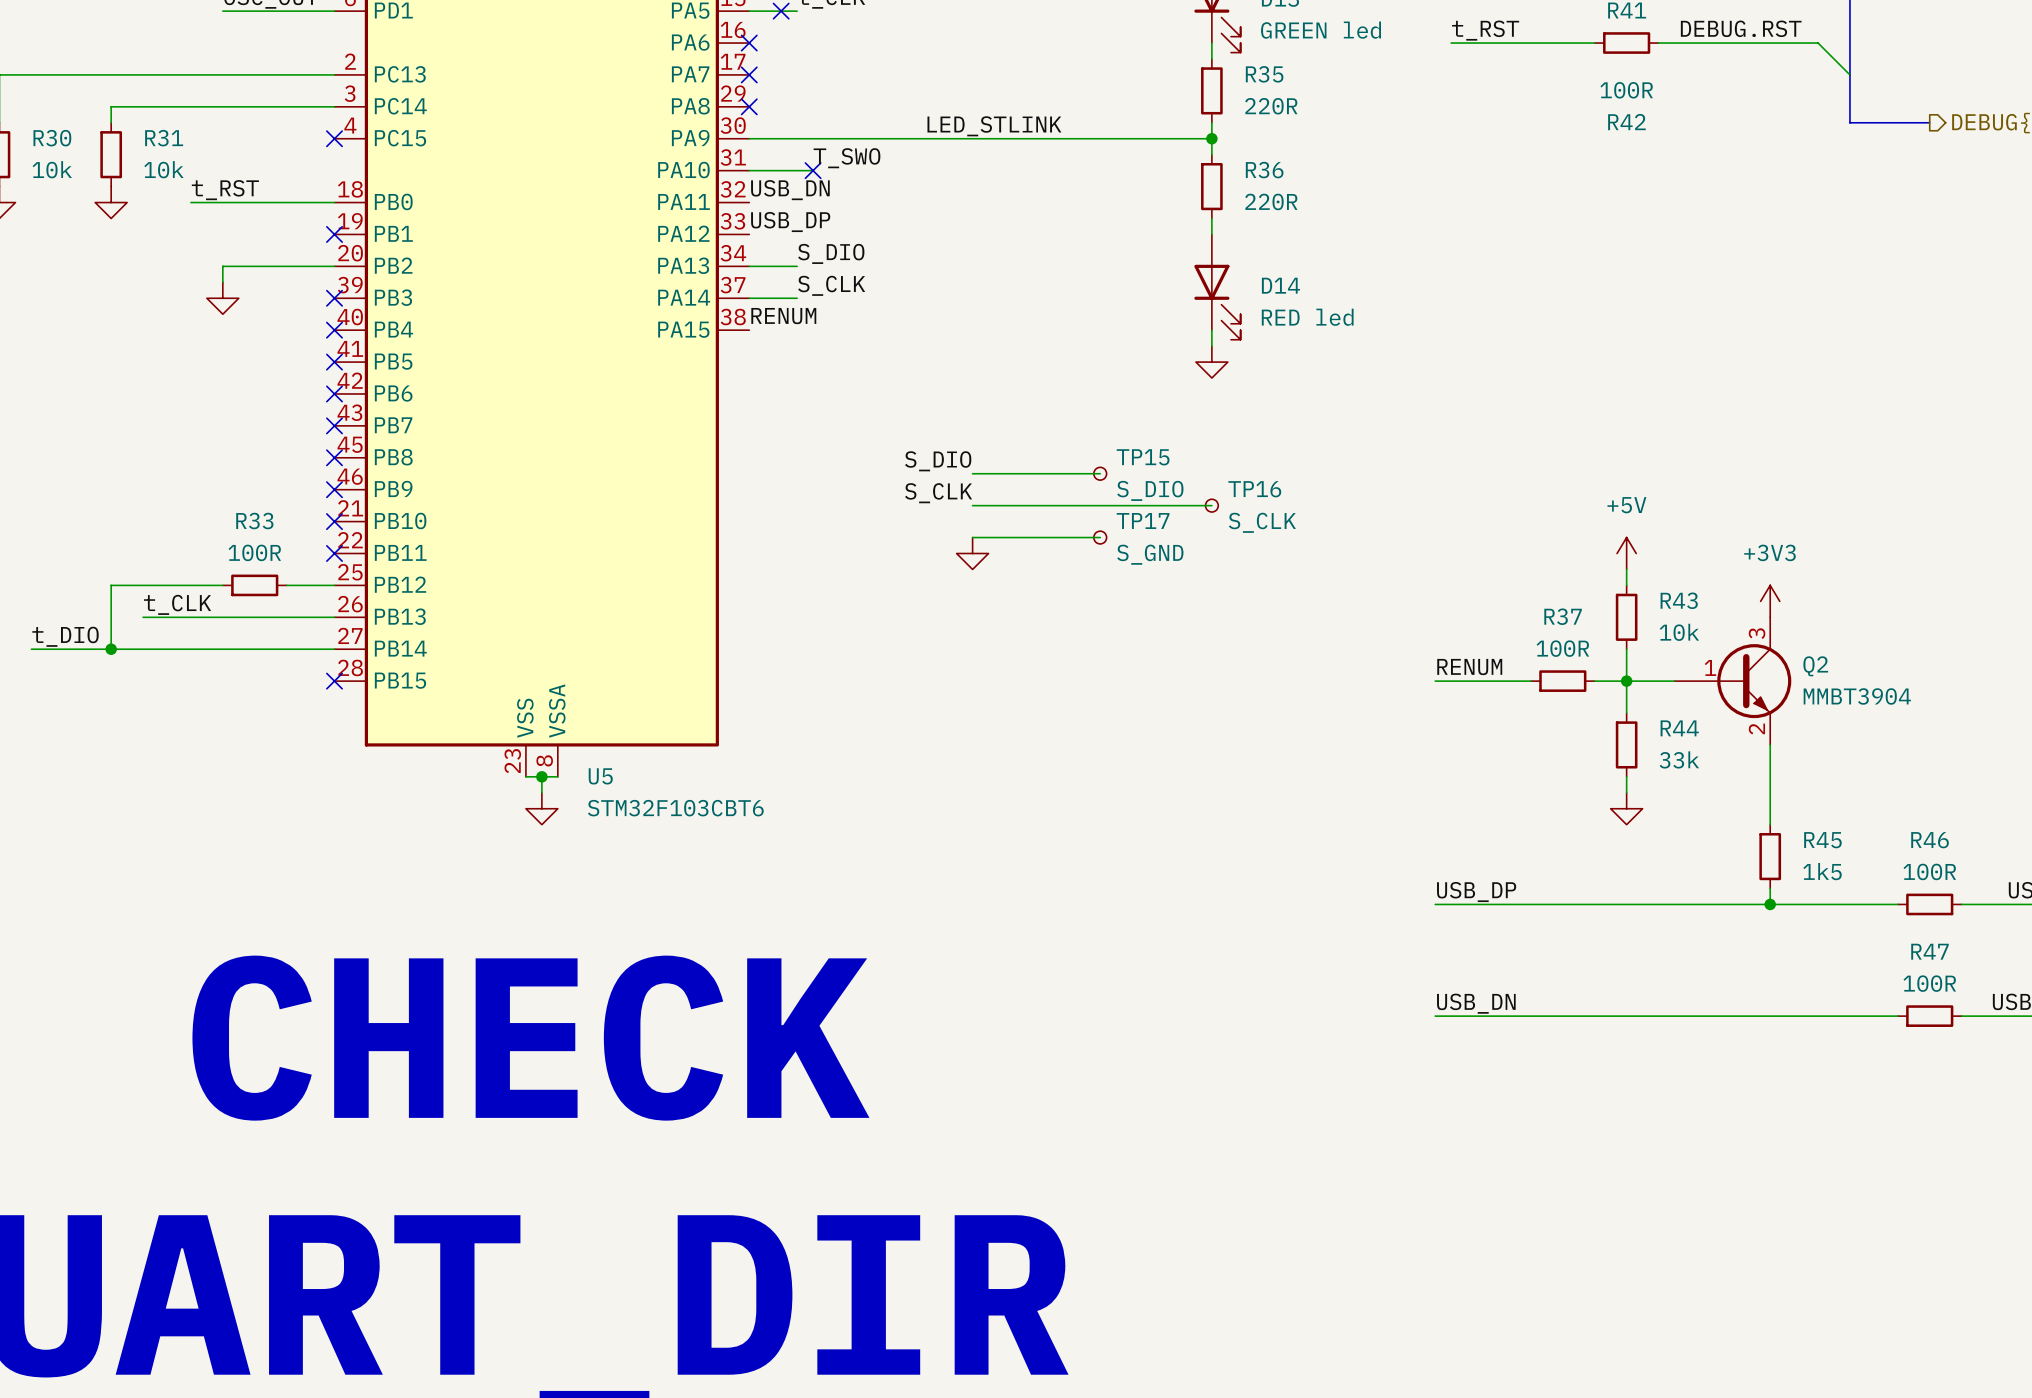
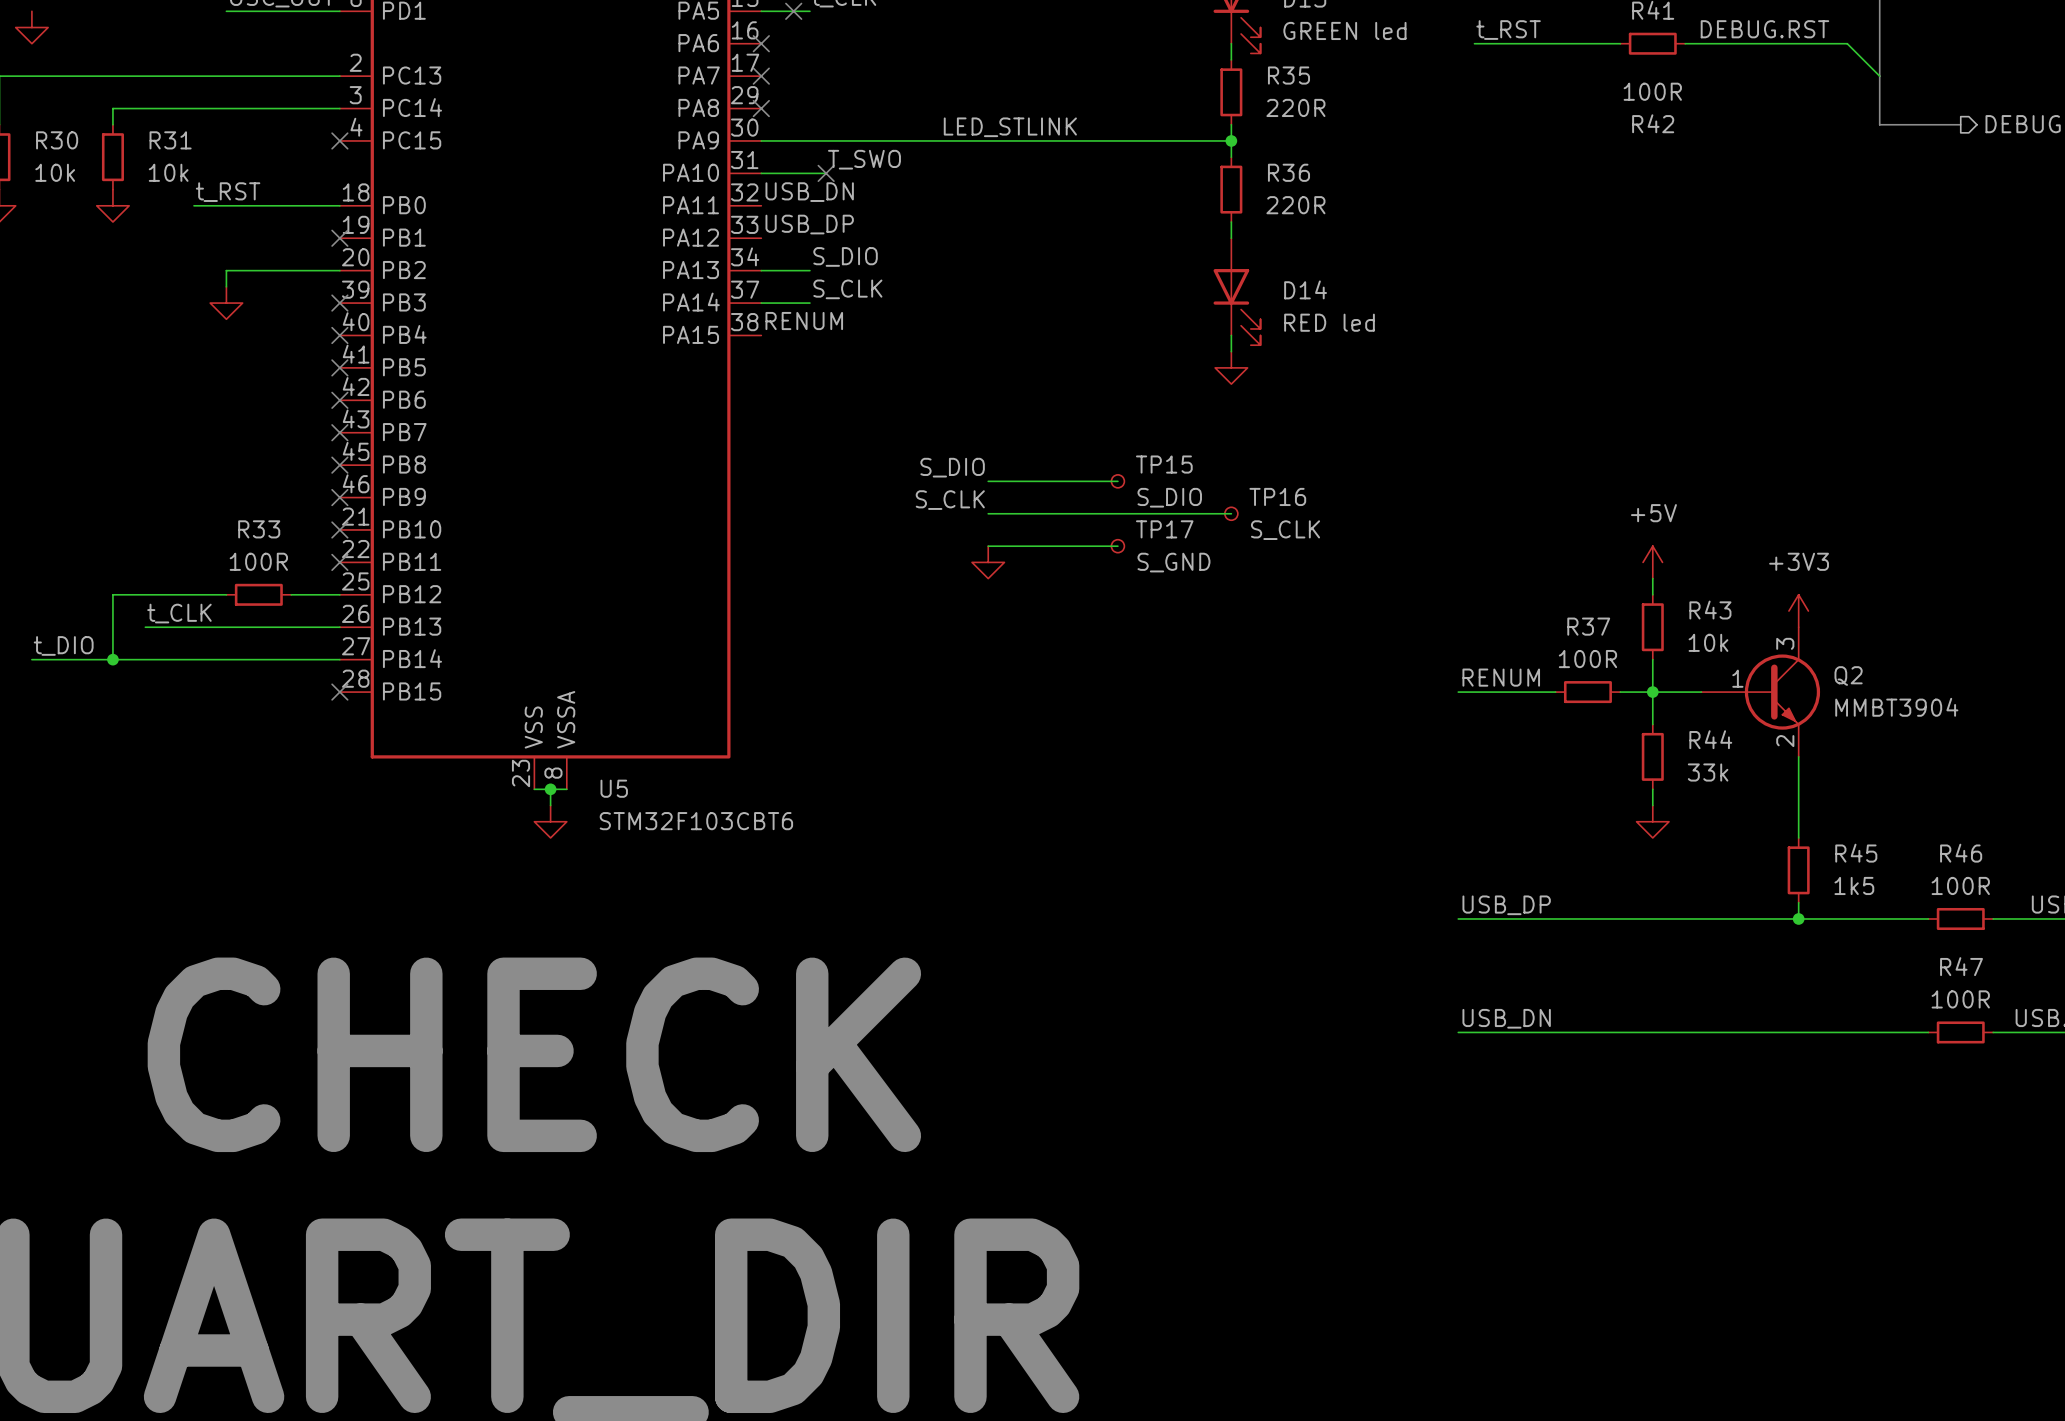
power symbol: none -> (31, 27)

